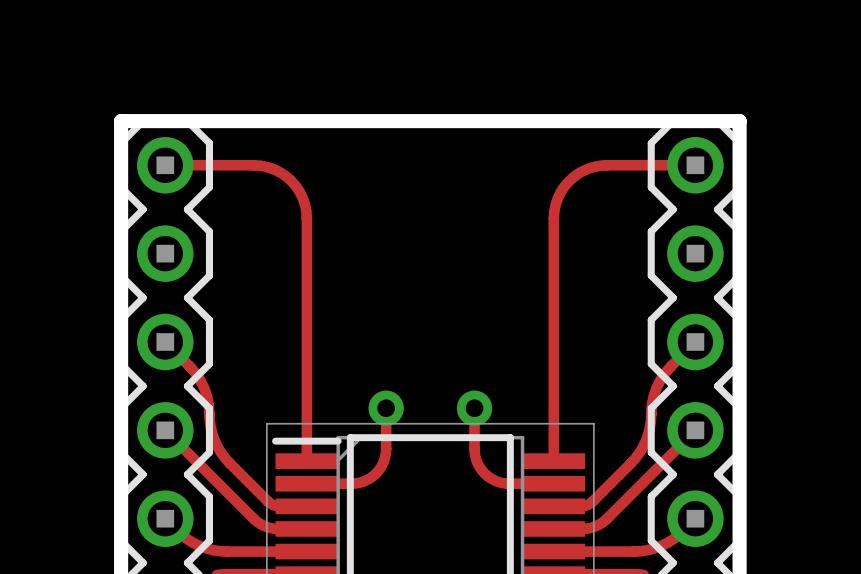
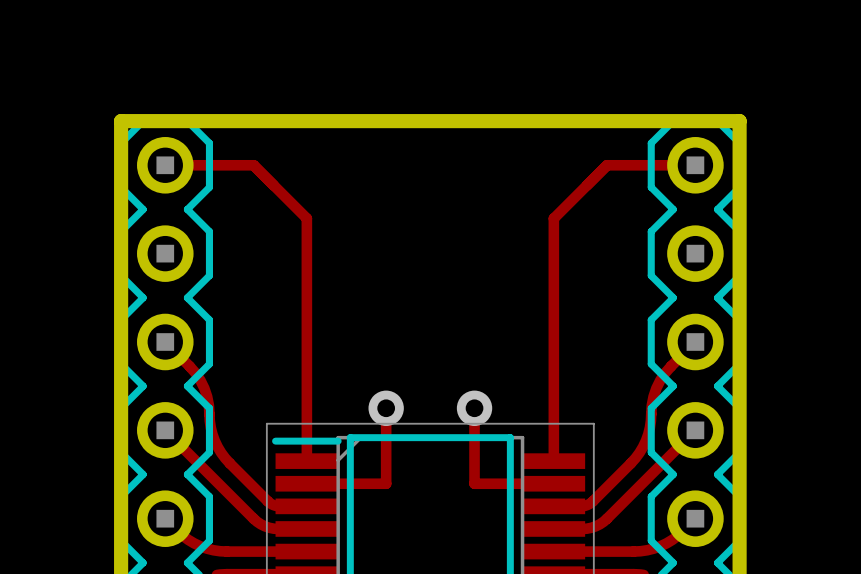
track: (253, 165) (274, 169) (291, 180) (302, 198) (306, 218) -> (253, 165) (306, 218)
track: (607, 165) (586, 169) (569, 180) (557, 198) (553, 218) -> (607, 165) (553, 218)
track: (386, 448) (383, 462) (375, 473) (364, 481) (351, 483) -> (386, 448) (386, 483) (351, 483)
track: (474, 448) (477, 462) (484, 473) (496, 481) (509, 483) -> (474, 448) (474, 483) (509, 483)

